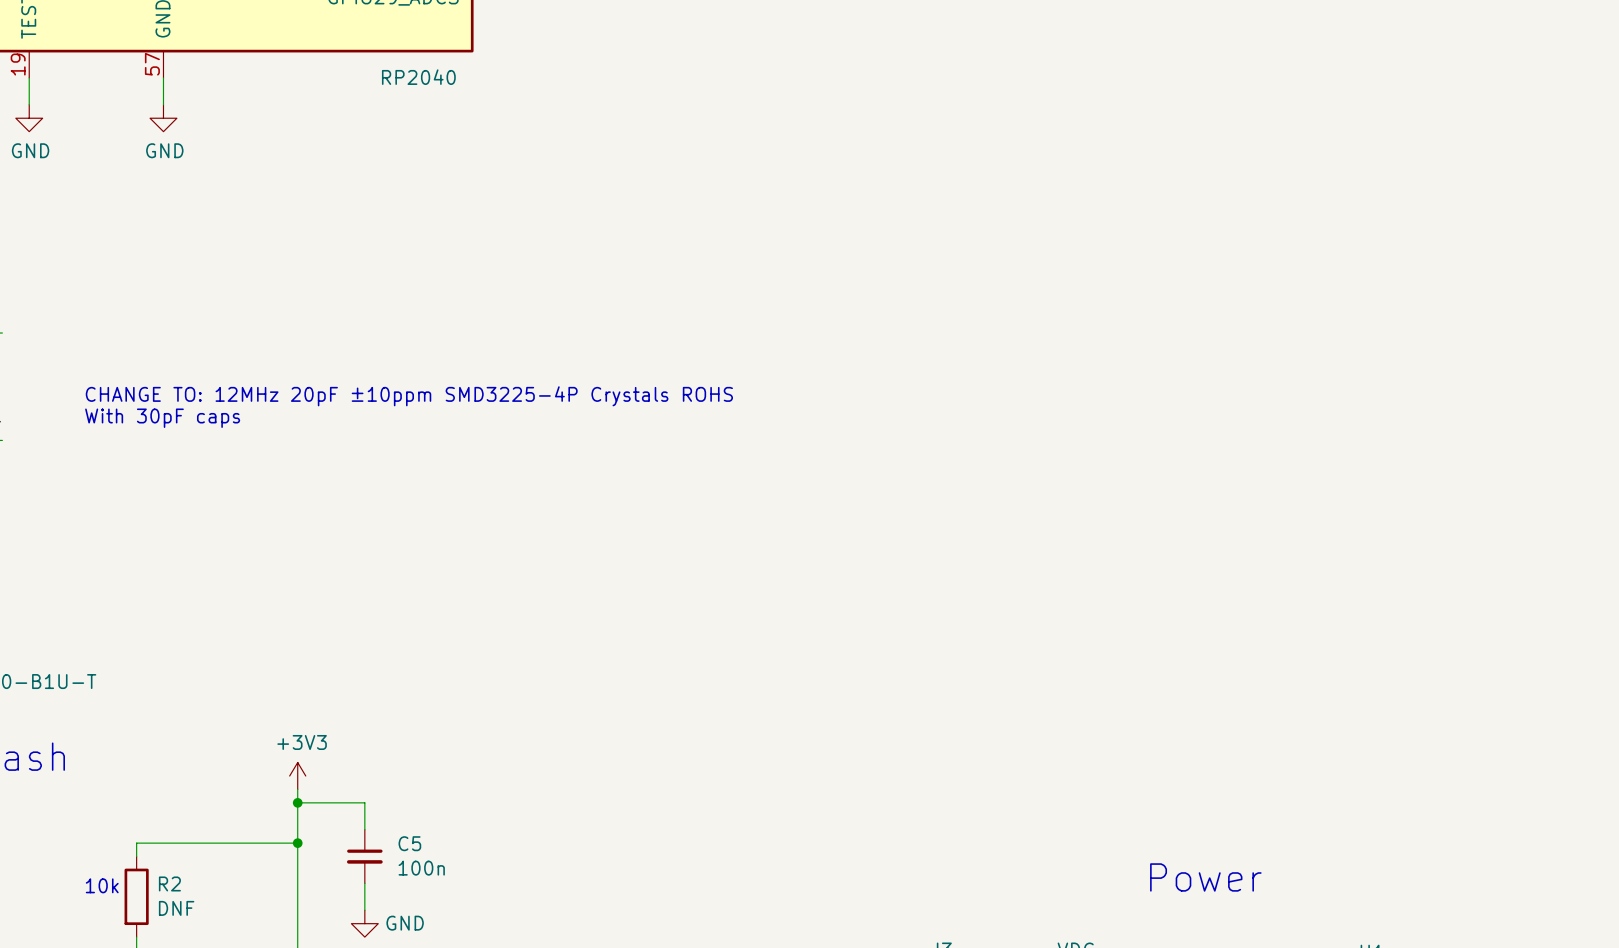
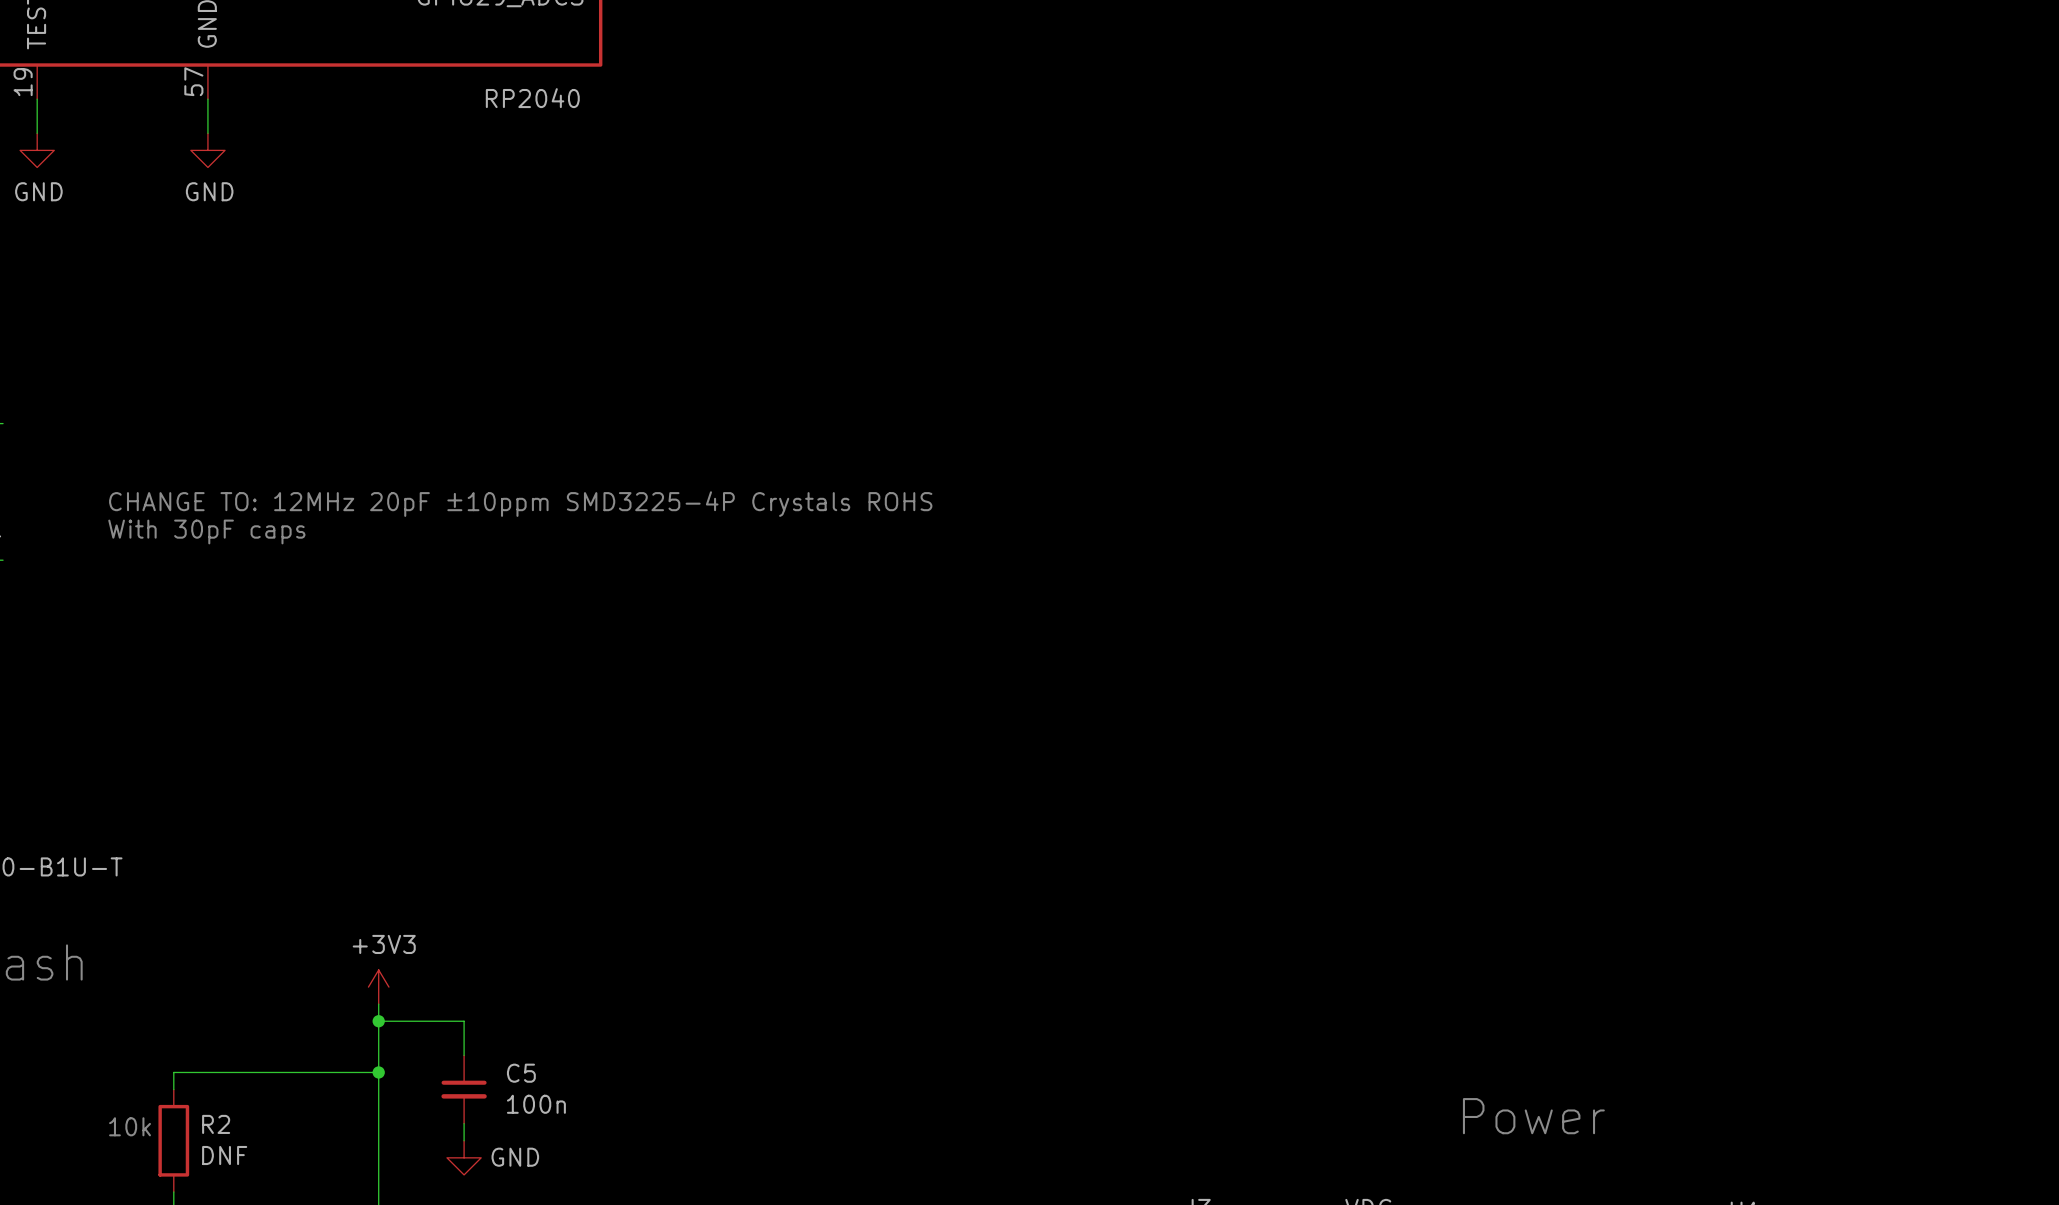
power symbol position: GND (364, 923) -> GND (464, 1157)

